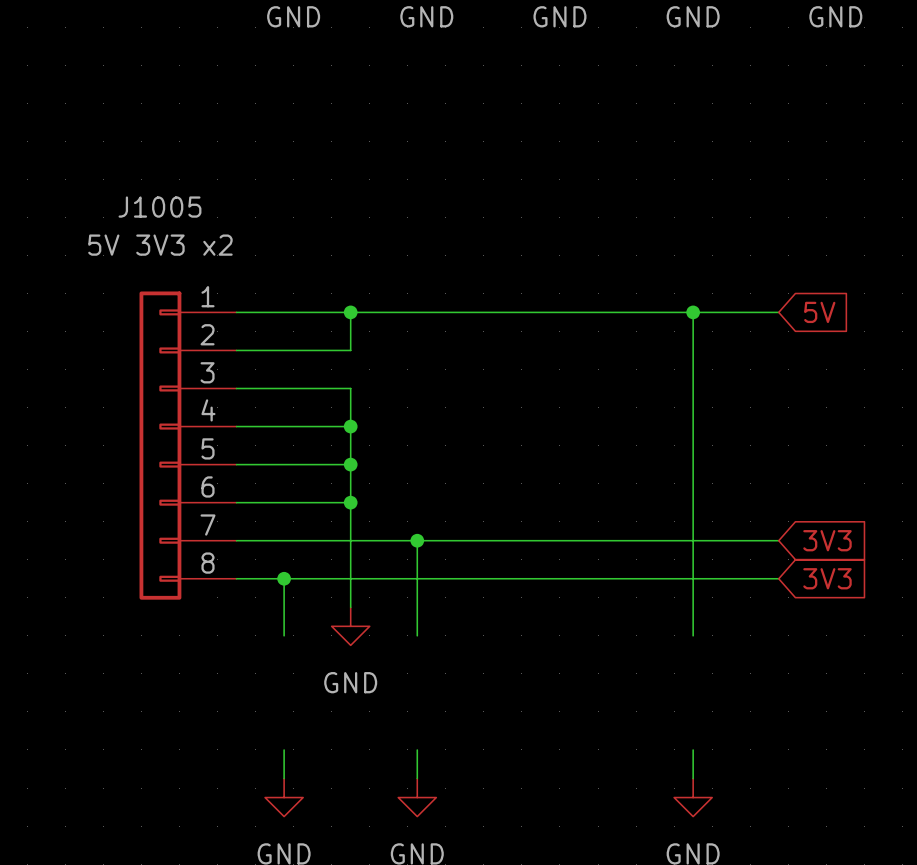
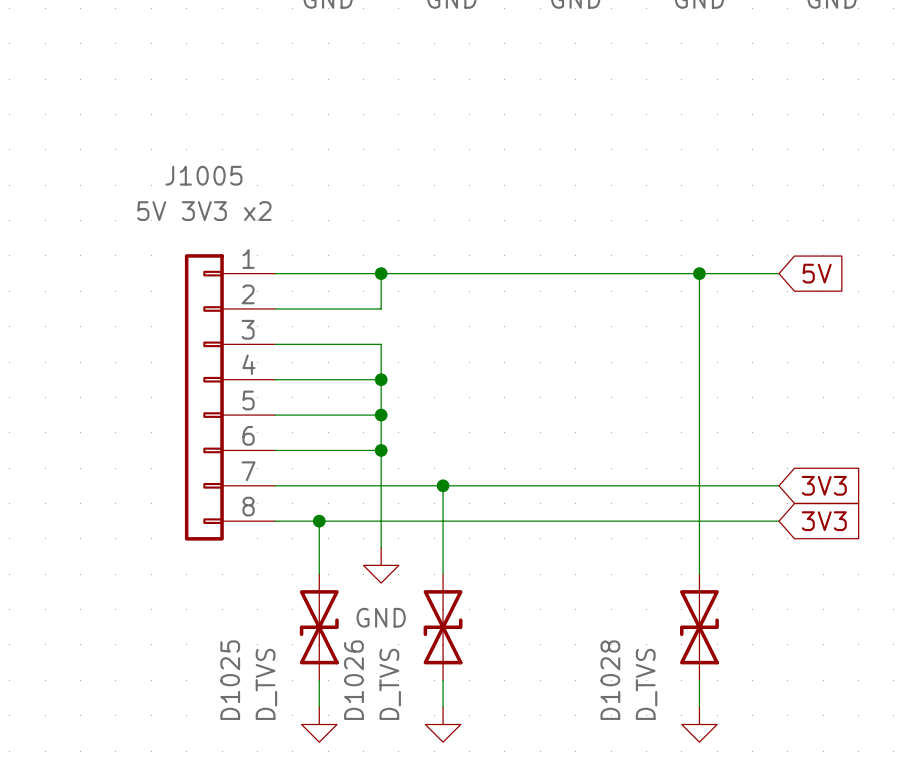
D1025: none -> D_TVS (319, 627)
D1026: none -> D_TVS (443, 627)
D1028: none -> D_TVS (699, 627)

